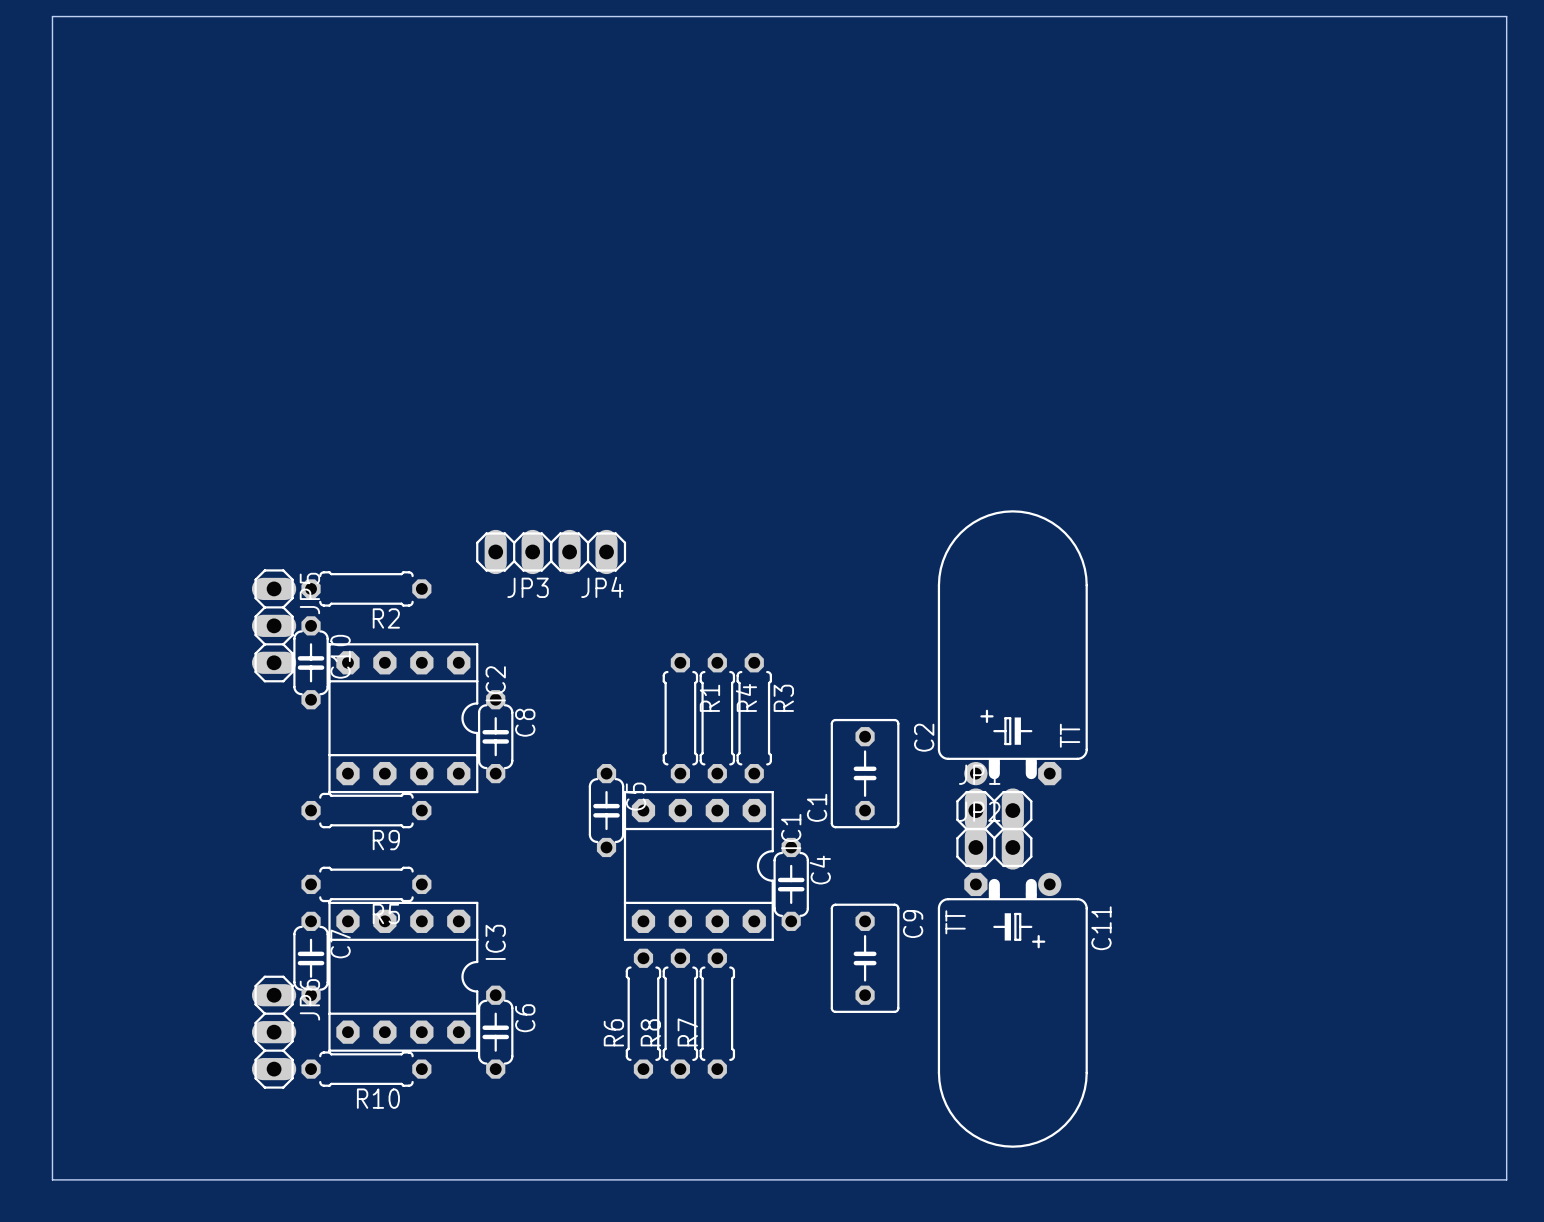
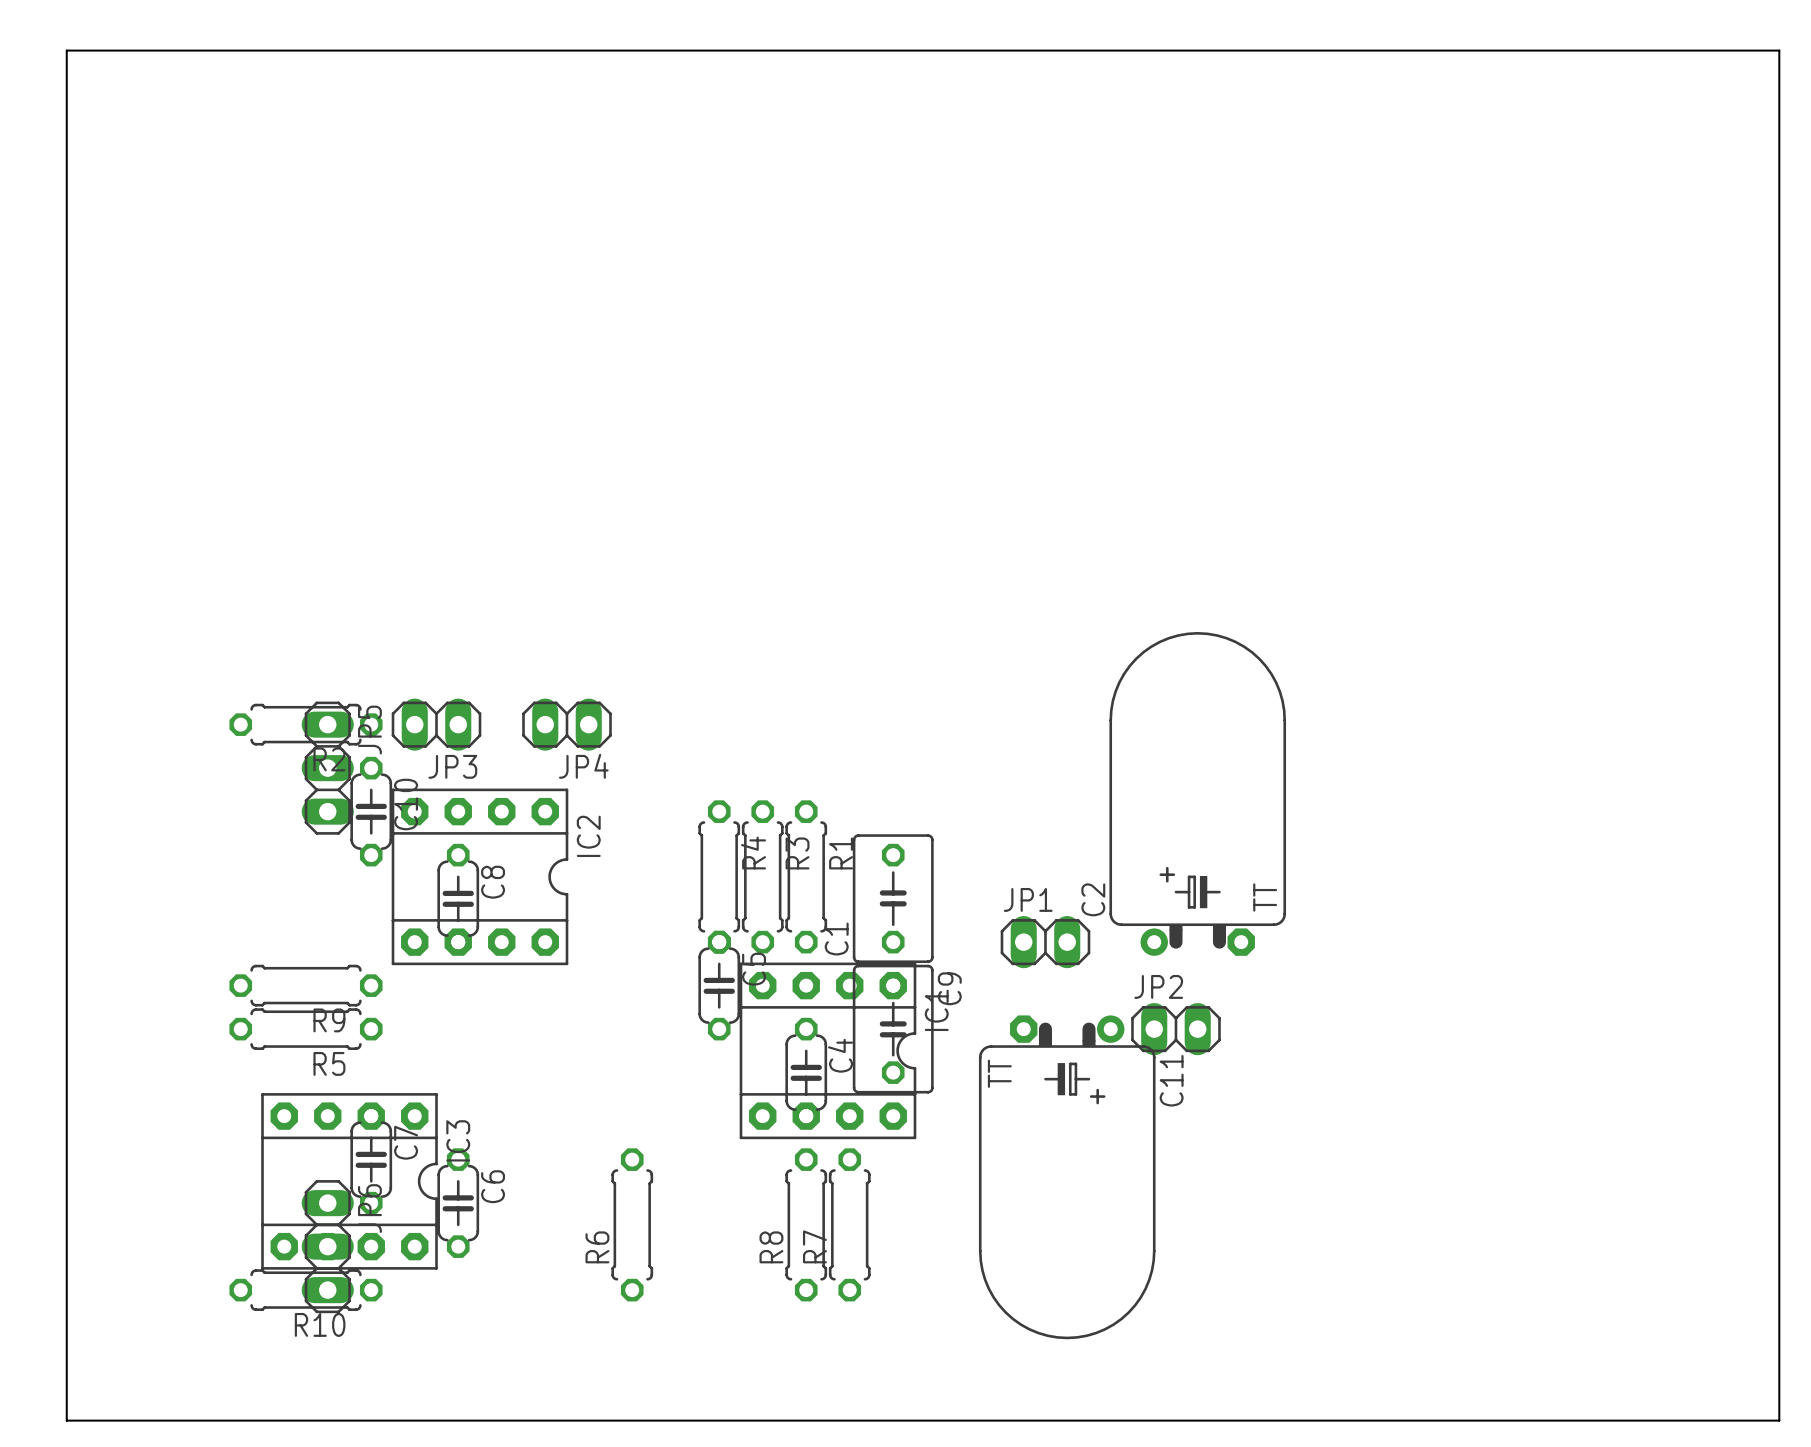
JP3 position: (514, 551) -> (436, 724)
JP4 position: (588, 551) -> (566, 724)
R2 position: (366, 588) -> (306, 724)
R4 position: (717, 718) -> (719, 876)
R3 position: (754, 718) -> (762, 876)
C8 position: (495, 736) -> (458, 898)
C1 position: (865, 773) -> (893, 898)
R9 position: (366, 810) -> (306, 985)
JP1 position: (994, 810) -> (1045, 942)
R5 position: (366, 884) -> (306, 1029)
C4 position: (791, 884) -> (806, 1072)
C9 position: (865, 958) -> (893, 1029)
IC3 position: (403, 976) -> (349, 1181)
C11 position: (1012, 1010) -> (1067, 1177)
R6 position: (643, 1013) -> (632, 1224)
C6 position: (495, 1032) -> (458, 1203)
R10 position: (366, 1069) -> (306, 1290)

